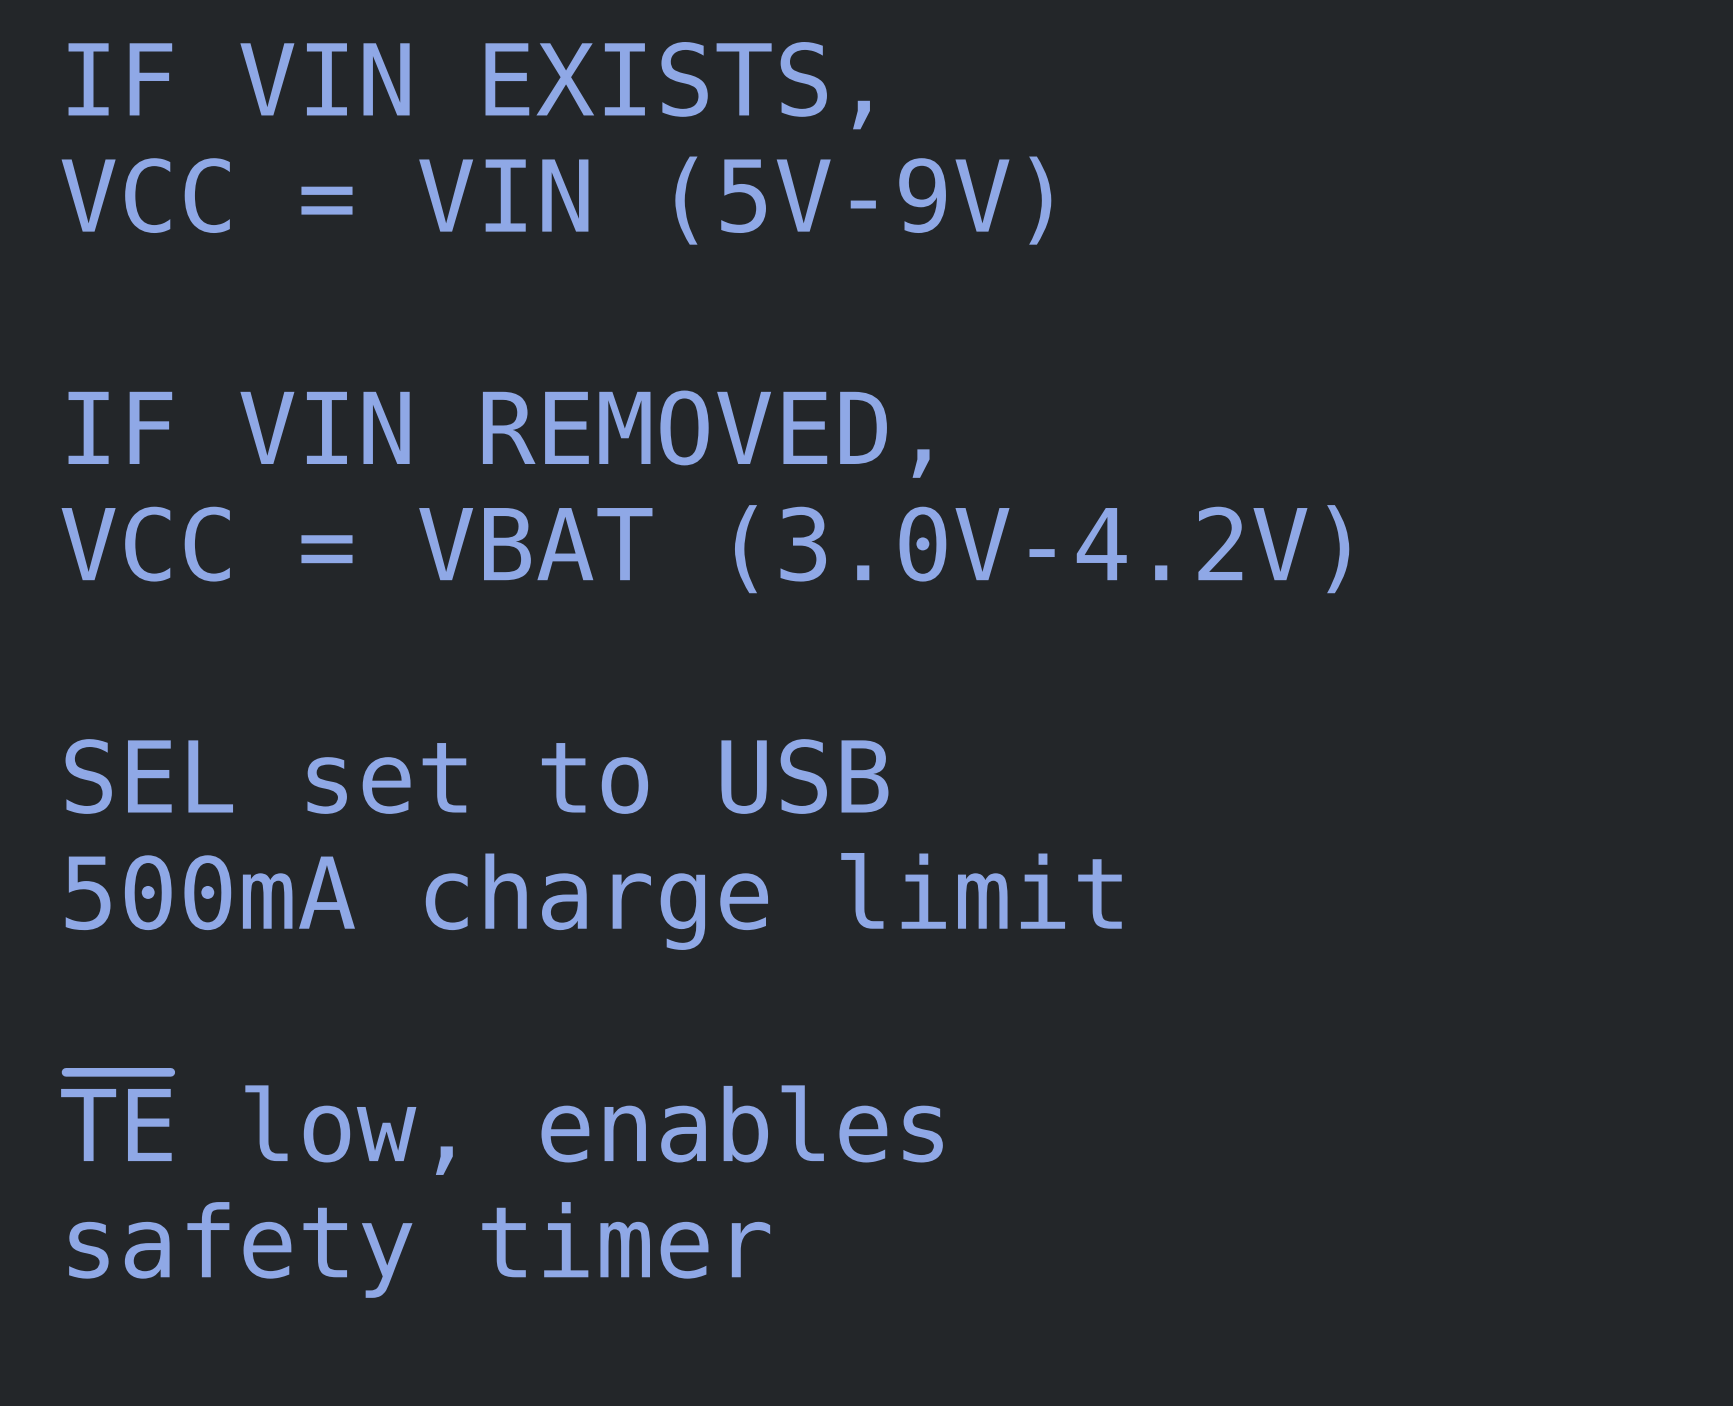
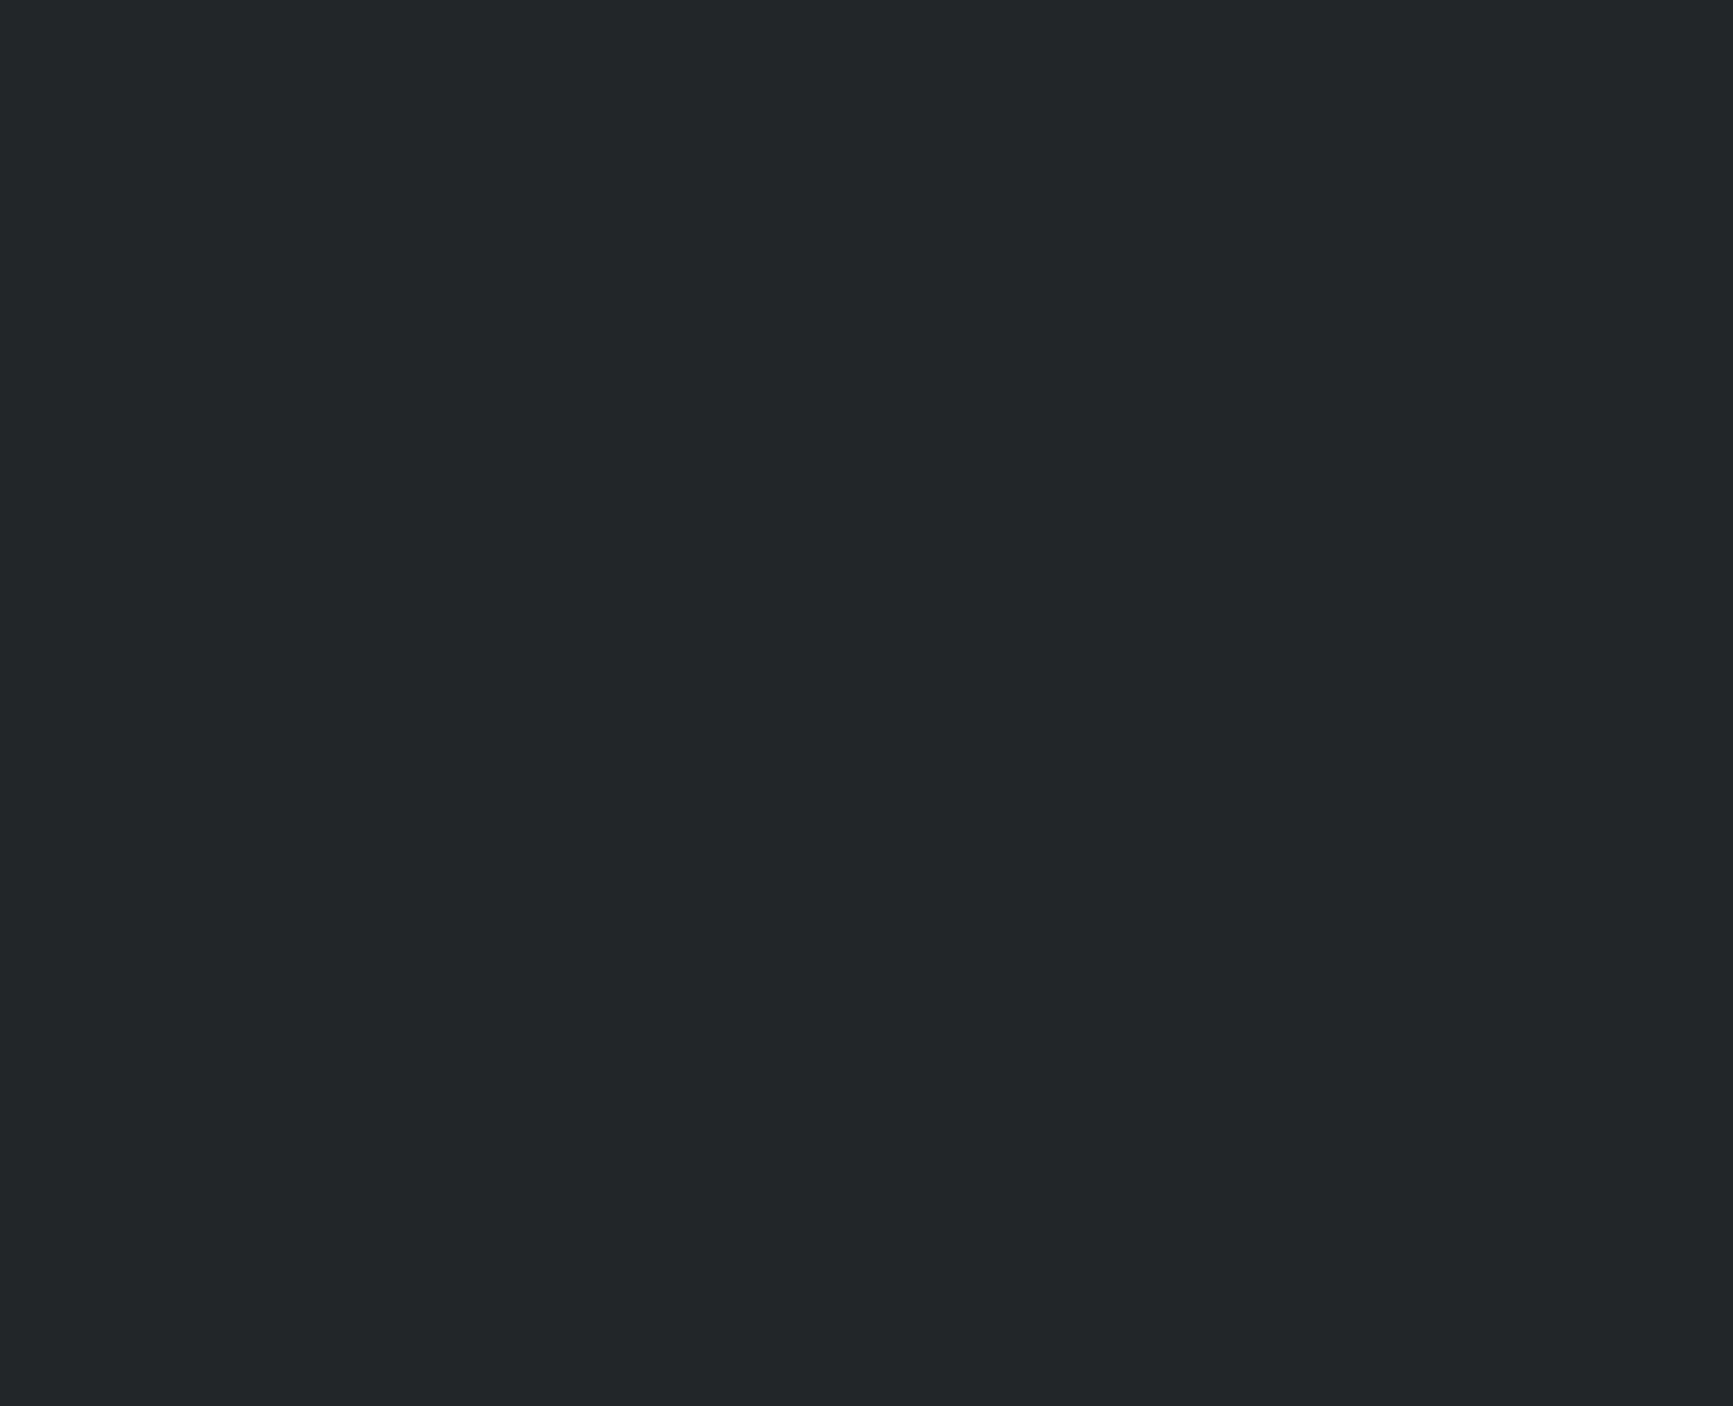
text: IF VIN EXISTS, (469, 85) -> none
text: VCC = VIN (5V-9V) (556, 200) -> none
text: IF VIN REMOVED, (499, 434) -> none
text: VCC = VBAT (3.0V-4.2V) (705, 549) -> none
text: SEL set to USB (477, 776) -> none
text: 500mA charge limit (593, 901) -> none
text: ~{TE} low, enables (502, 1123) -> none
text: safety timer (419, 1249) -> none

